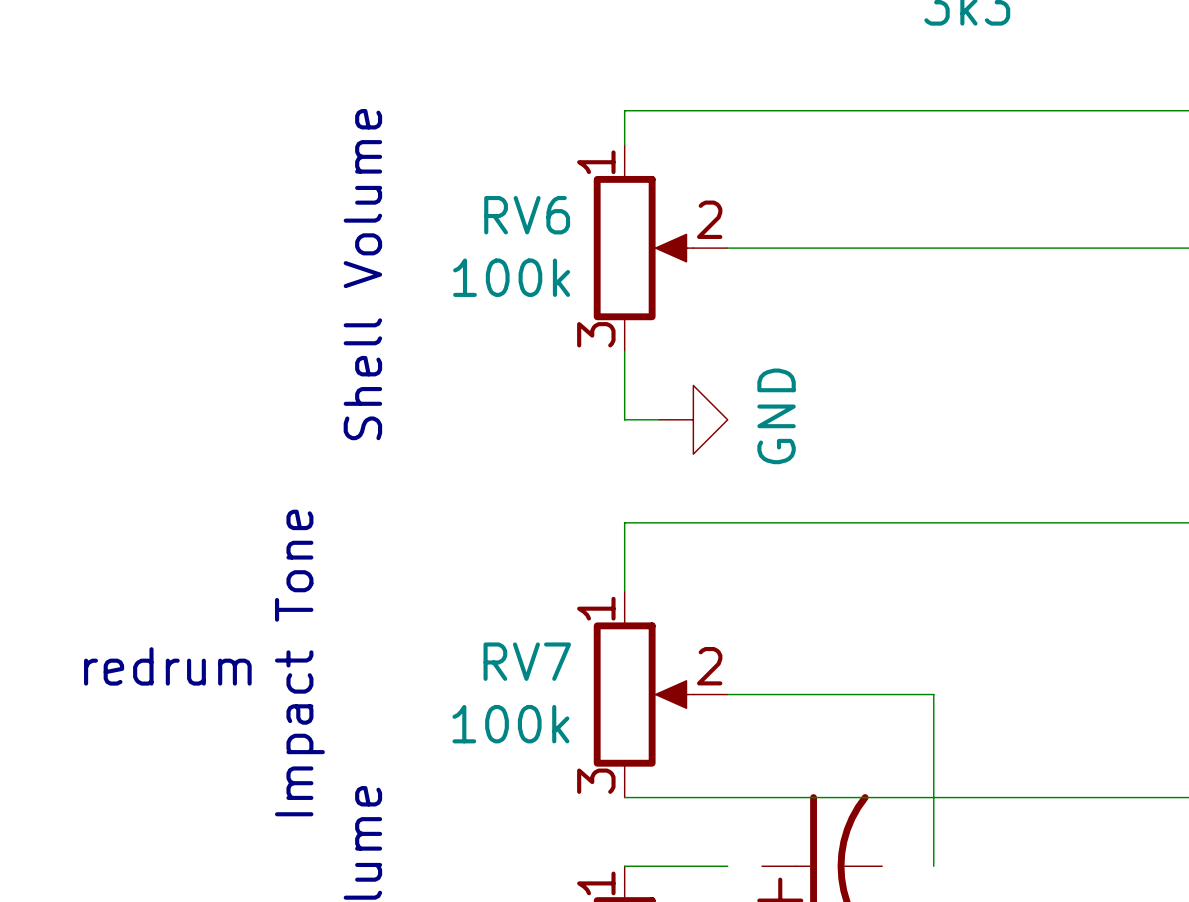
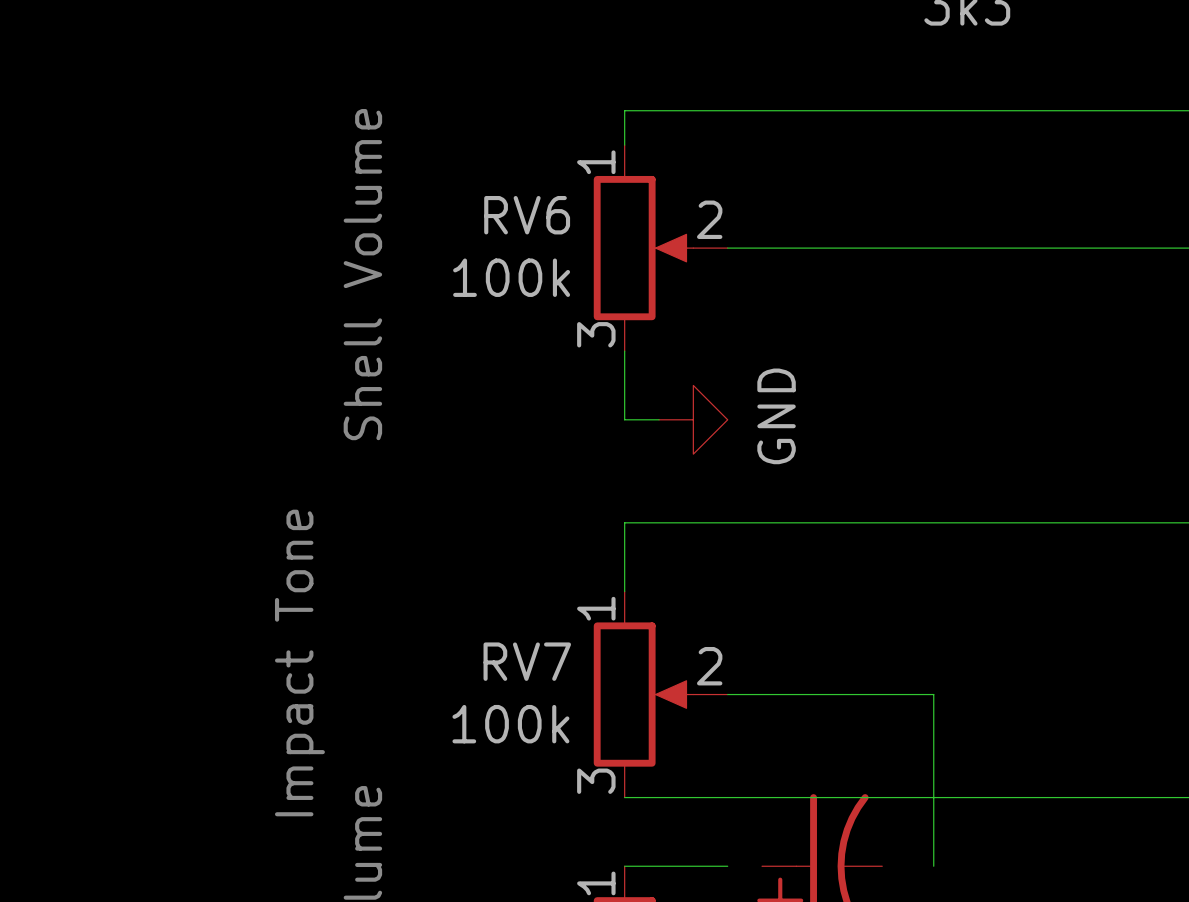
text: redrum (167, 666) -> none

